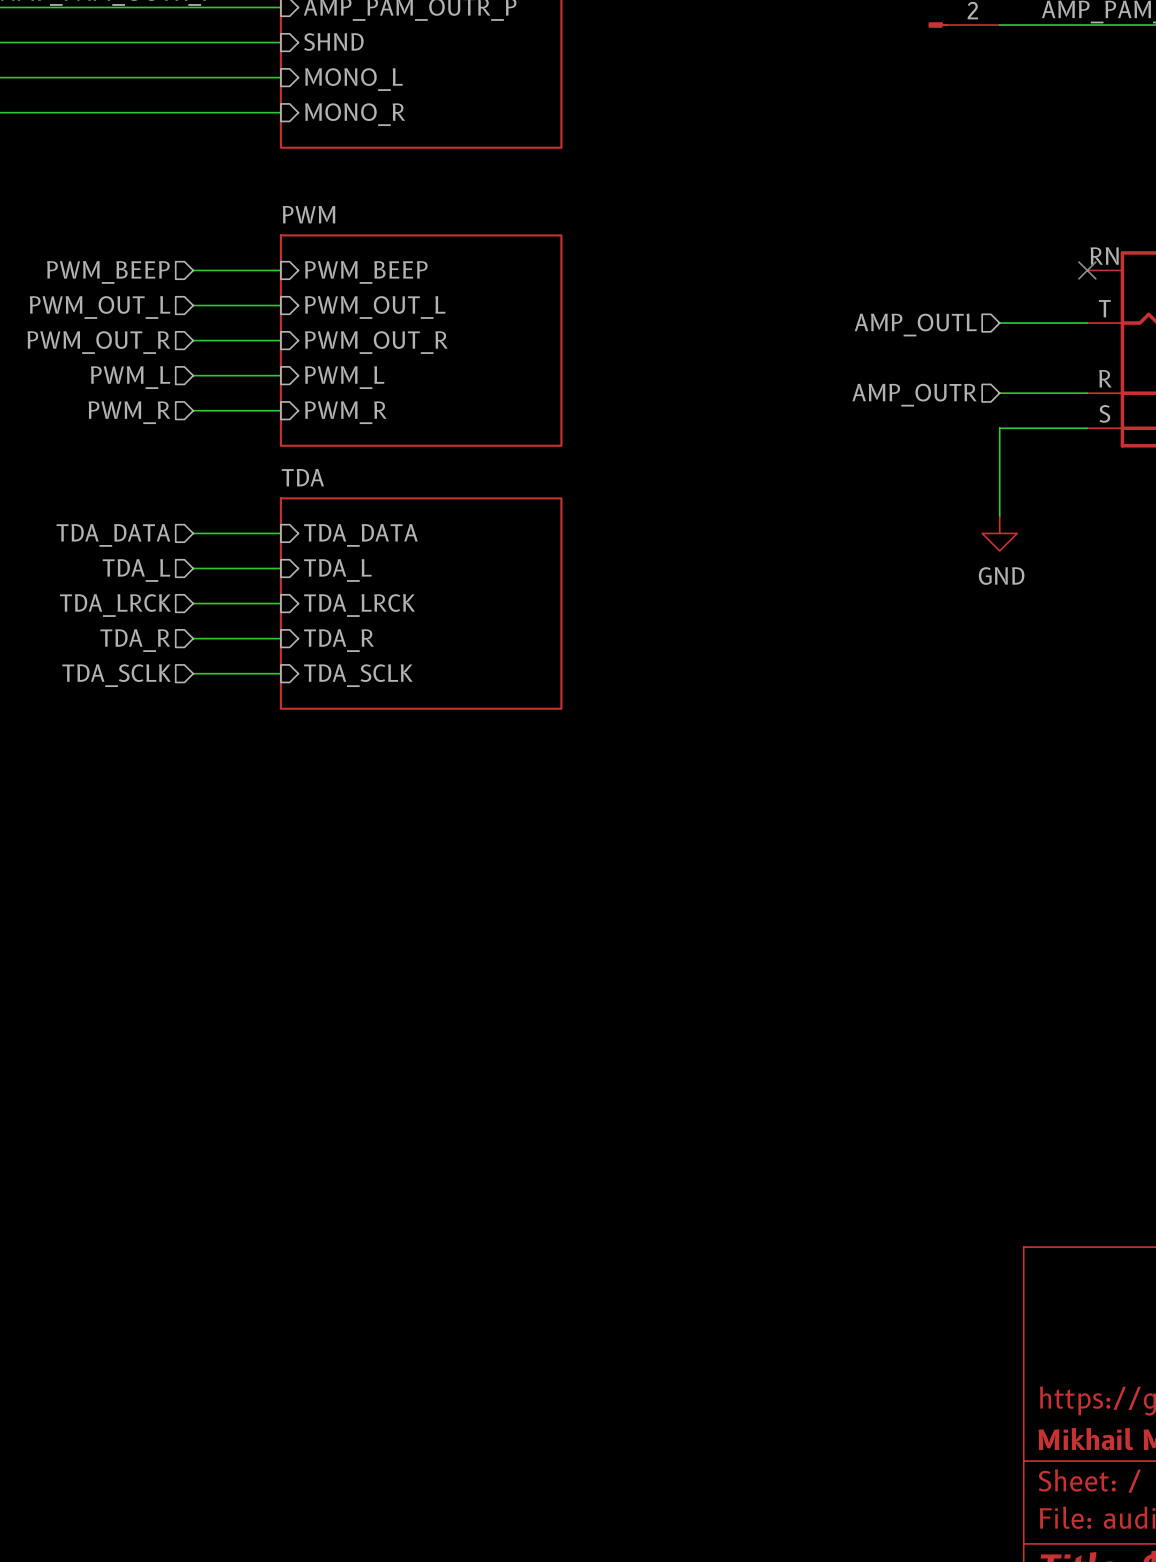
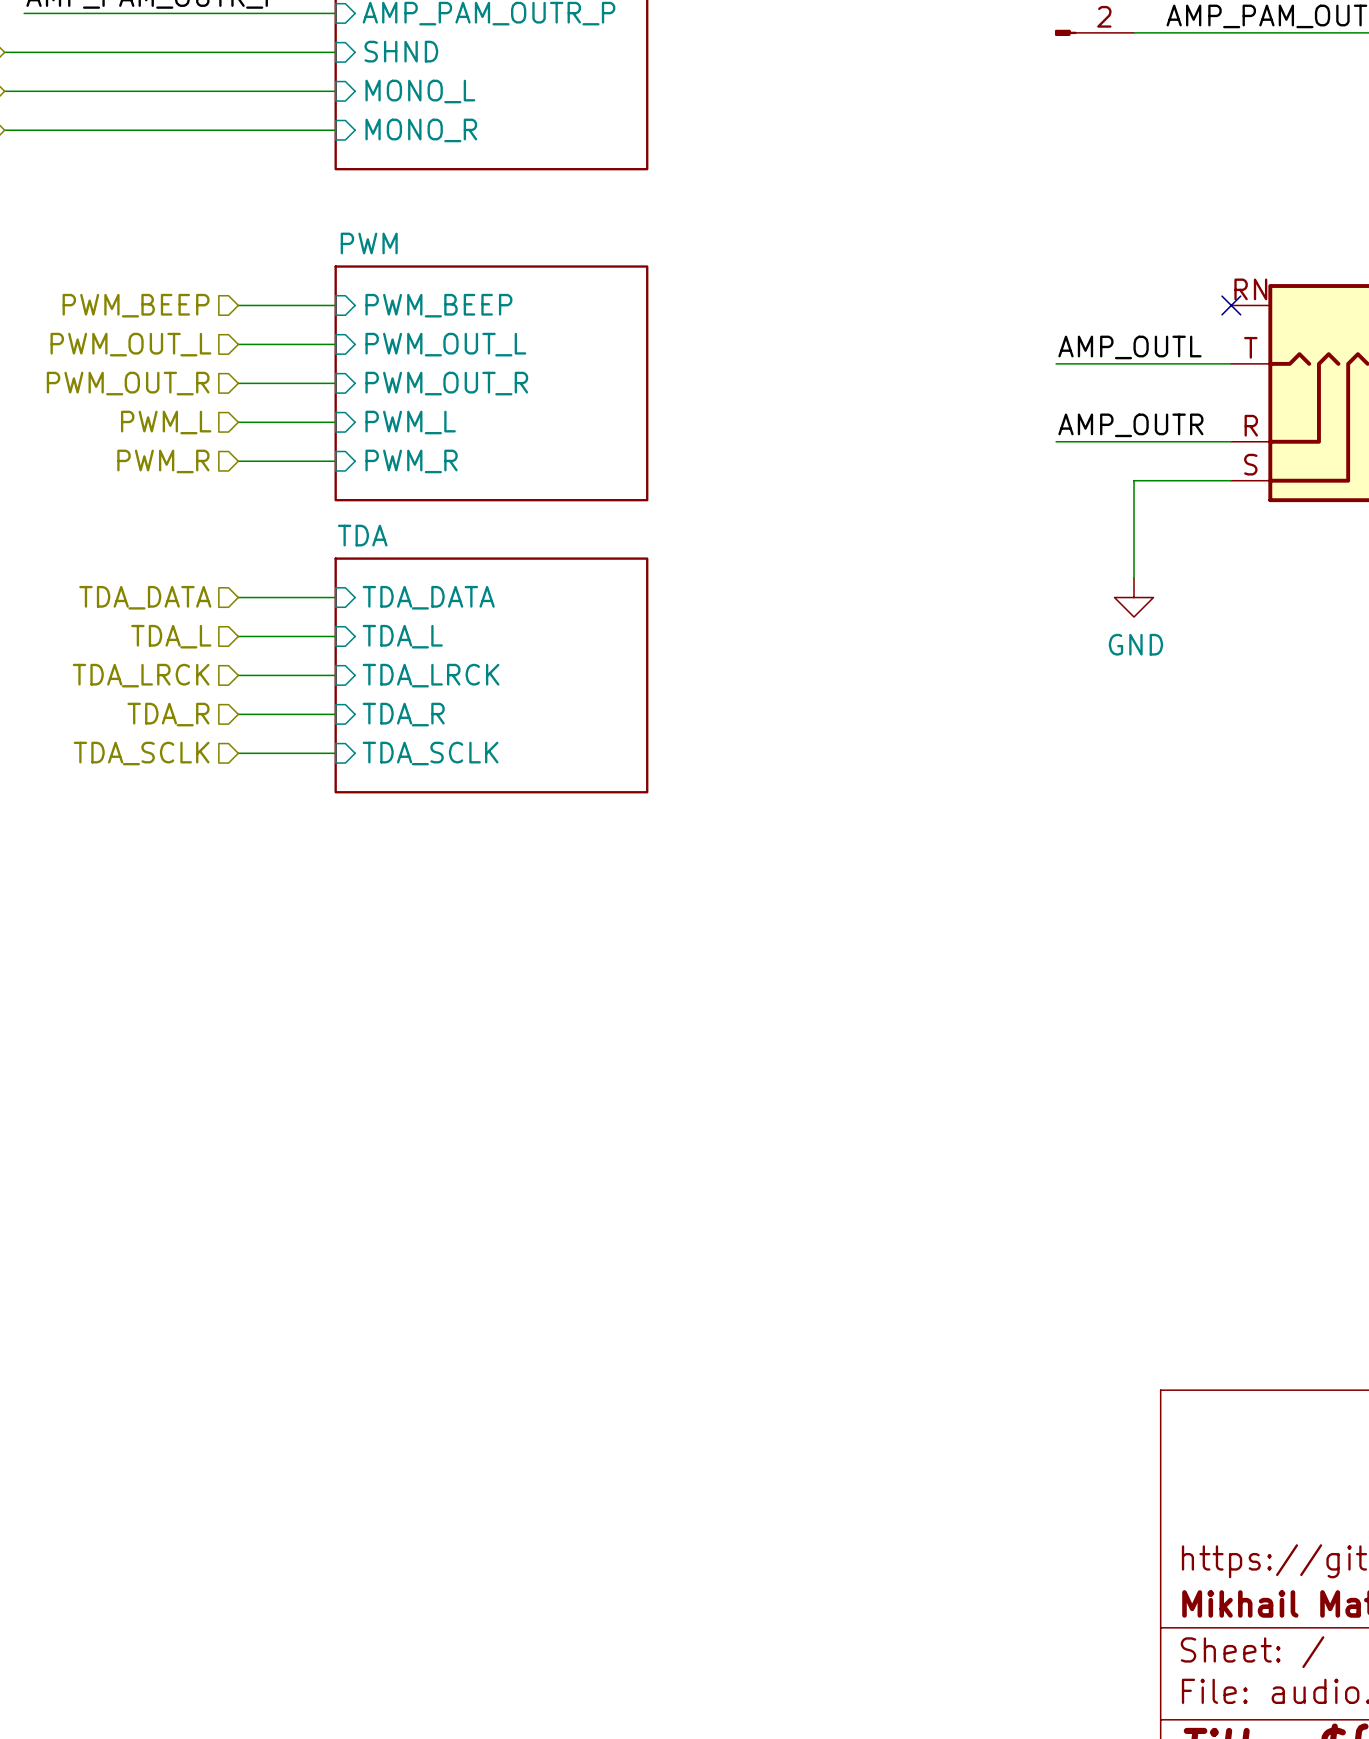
label: none -> AMP_OUTL (1129, 347)
wire: none -> (1056, 363) (1134, 363)
hierarchical label: AMP_OUTL (915, 325) -> none
label: none -> AMP_OUTR (1130, 425)
wire: none -> (1056, 441) (1134, 441)
hierarchical label: AMP_OUTR (914, 395) -> none

